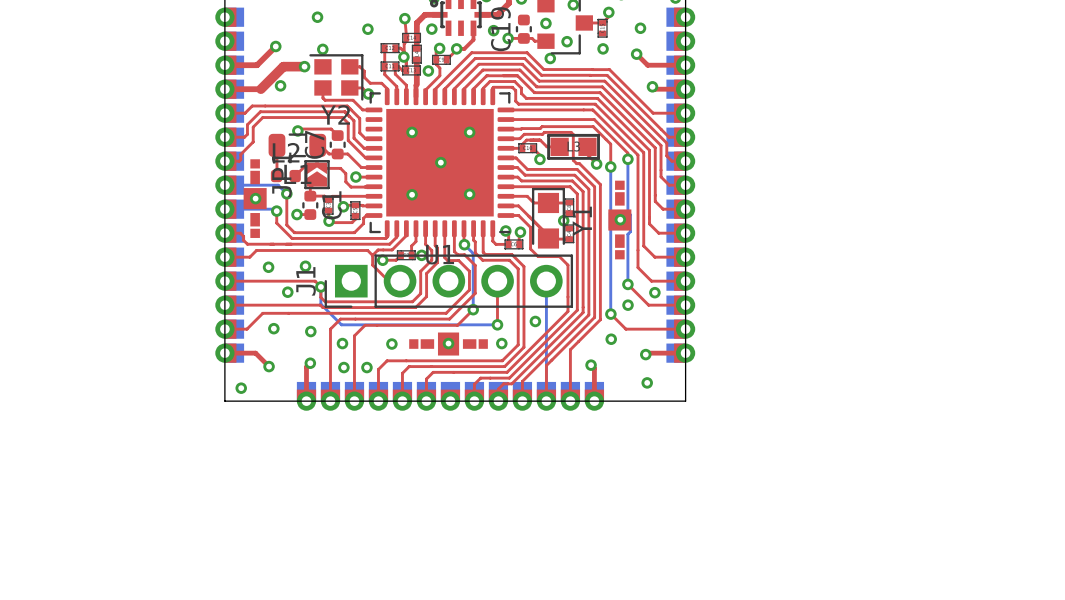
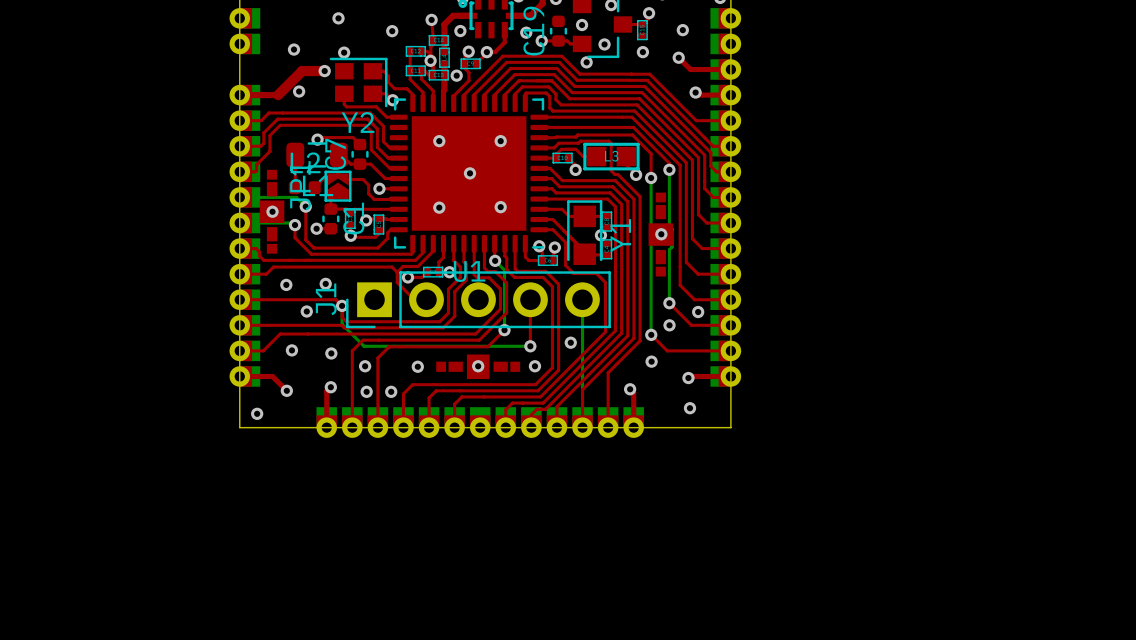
top track: (275, 46) (257, 65) (231, 65) -> none
part: (229, 65) -> none

